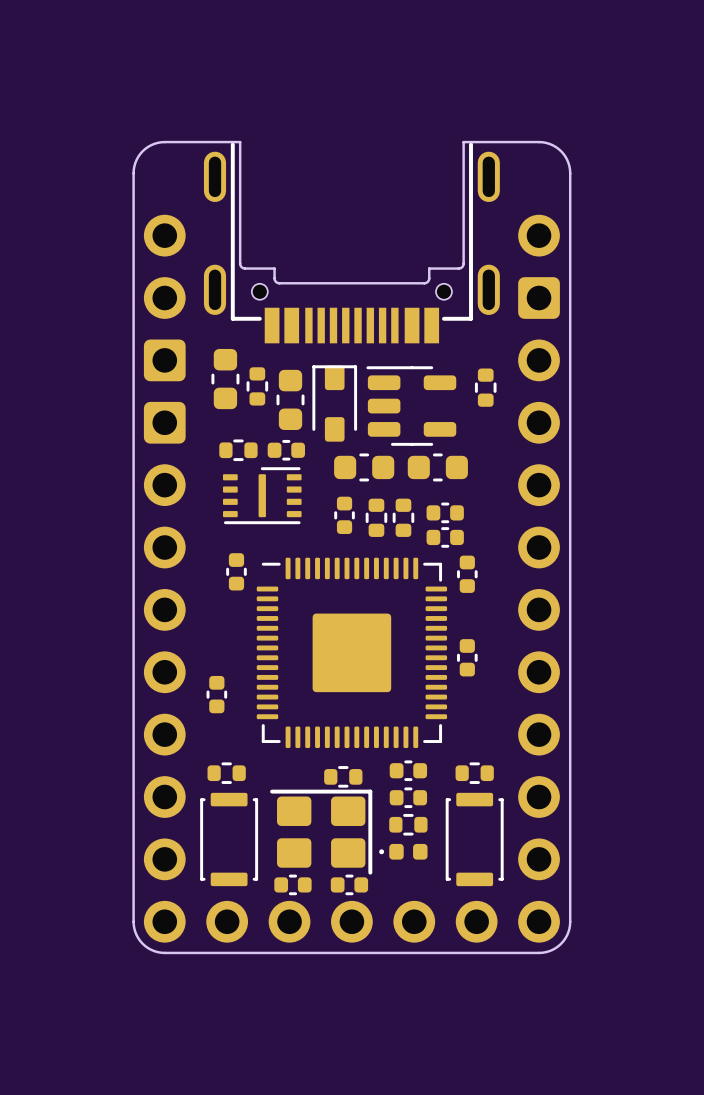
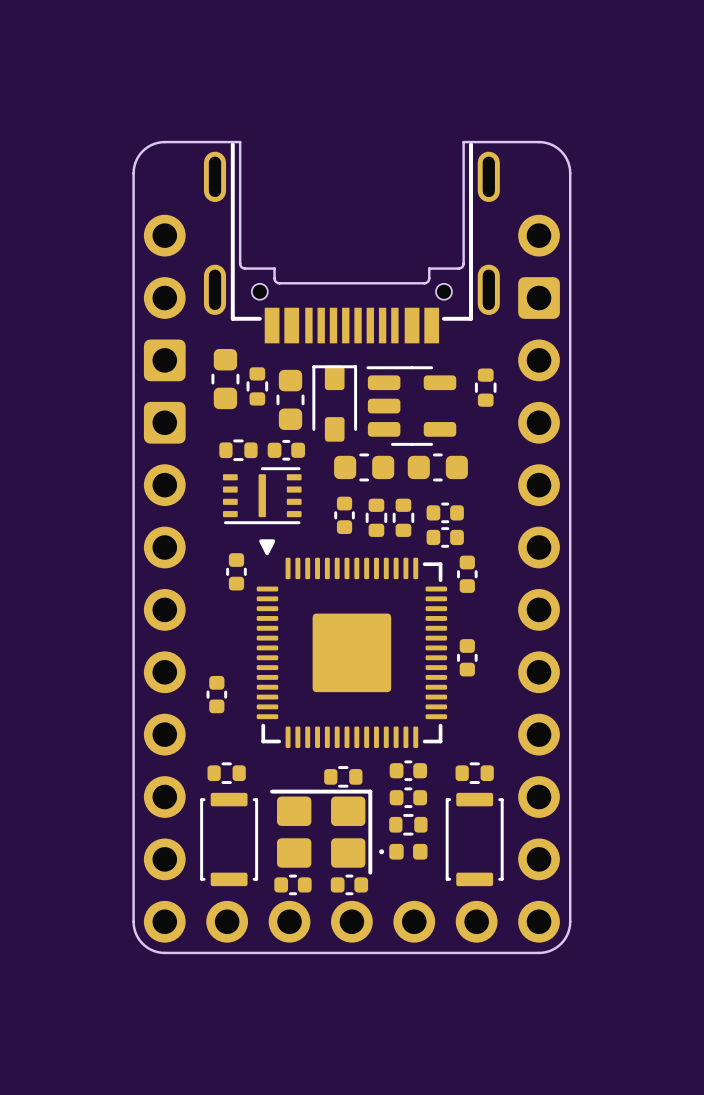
drawing: none -> [259, 539, 276, 556]
part footprint: [256, 557, 448, 749] -> [256, 557, 448, 749]

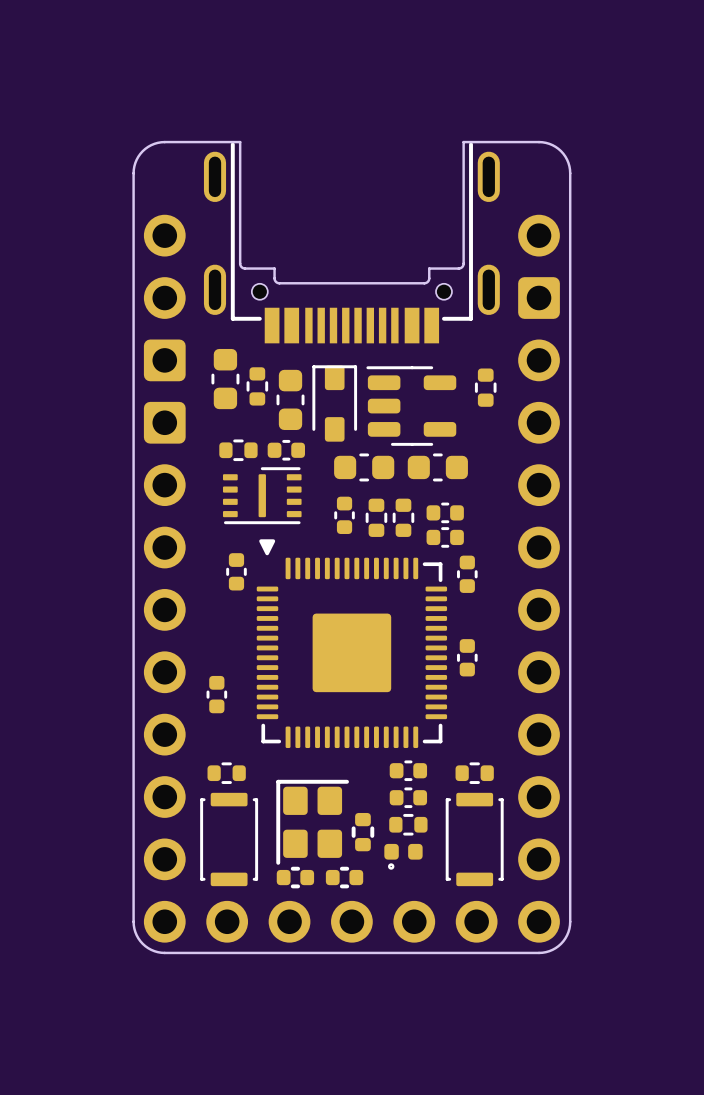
part: (343, 776) -> none
part footprint: [270, 789, 373, 875] -> [276, 779, 349, 865]
part: none -> (362, 832)
part footprint: [379, 843, 428, 860] -> [384, 843, 423, 870]
part footprint: [274, 874, 312, 896] -> [276, 866, 315, 889]
part footprint: [330, 874, 369, 896] -> [325, 866, 364, 889]

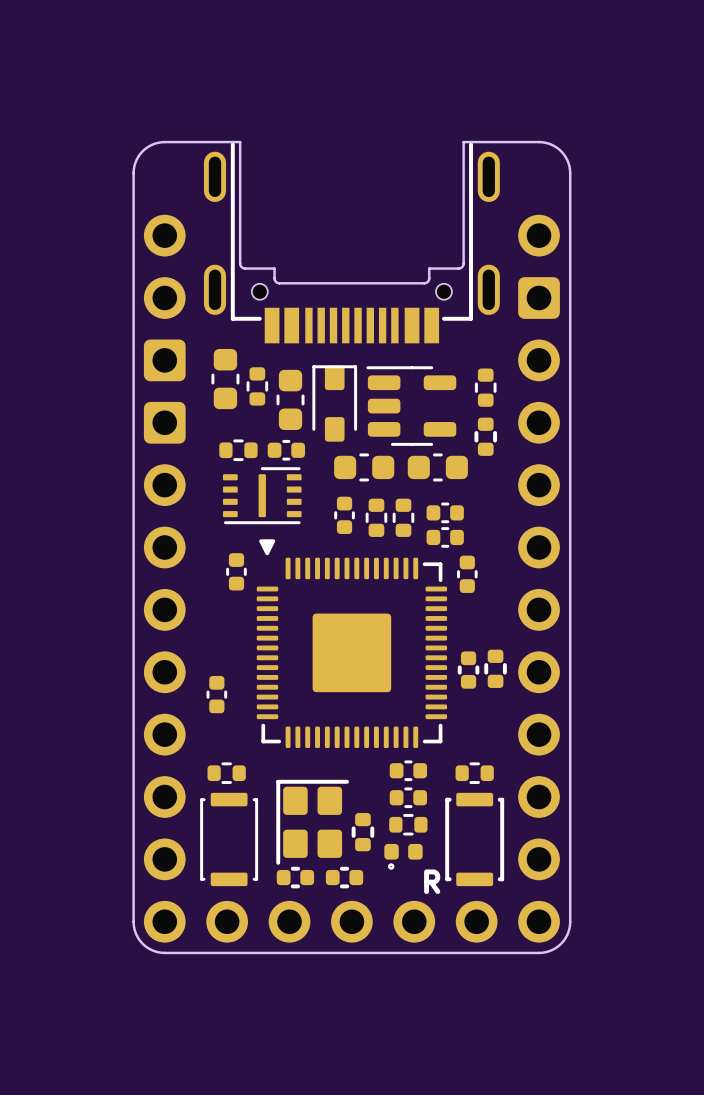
part: none -> (485, 436)
part footprint: [457, 639, 478, 677] -> [457, 651, 480, 689]
part: none -> (495, 668)
part footprint: [445, 792, 504, 887] -> [445, 792, 505, 887]

